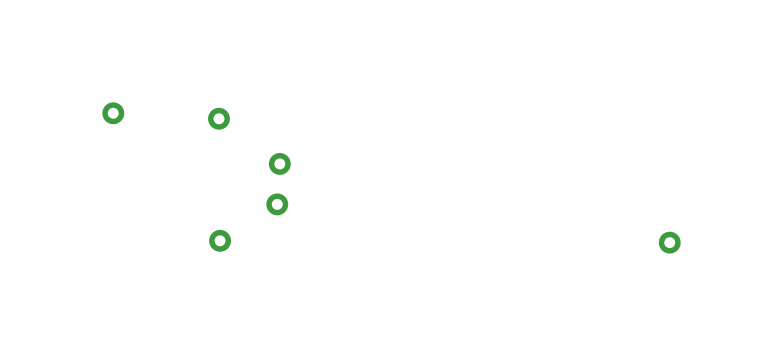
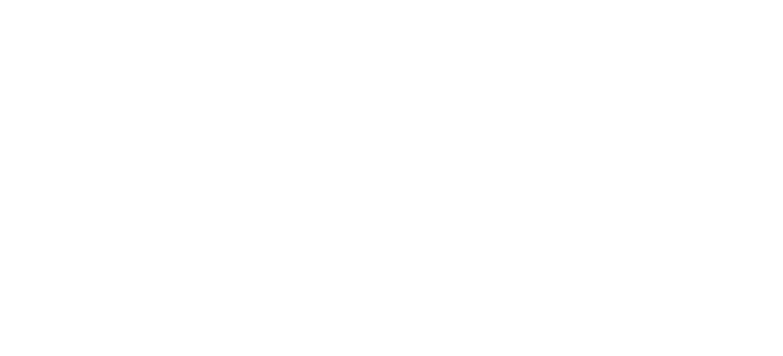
via: (113, 113) -> none
via: (218, 118) -> none
via: (279, 163) -> none
via: (277, 204) -> none
via: (220, 240) -> none
via: (669, 242) -> none

